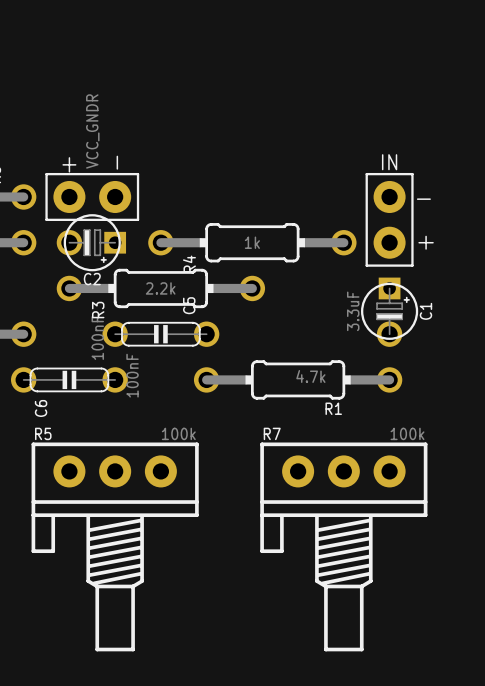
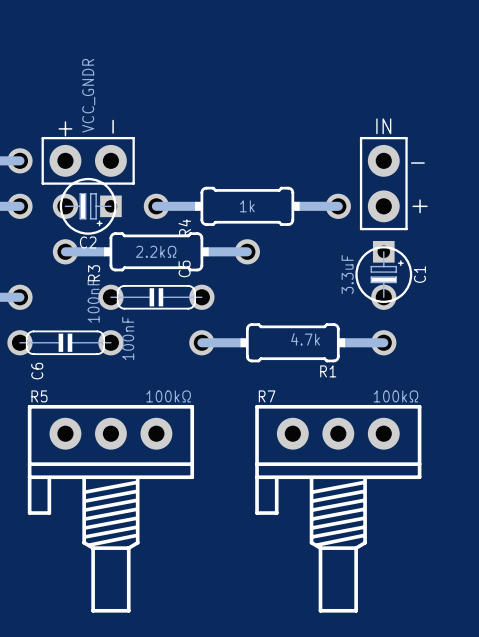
R3 value: 2.2k (160, 288) -> 2.2kΩ (156, 251)
R5 value: 100k (178, 433) -> 100kΩ (168, 396)
R7 value: 100k (407, 433) -> 100kΩ (395, 396)

